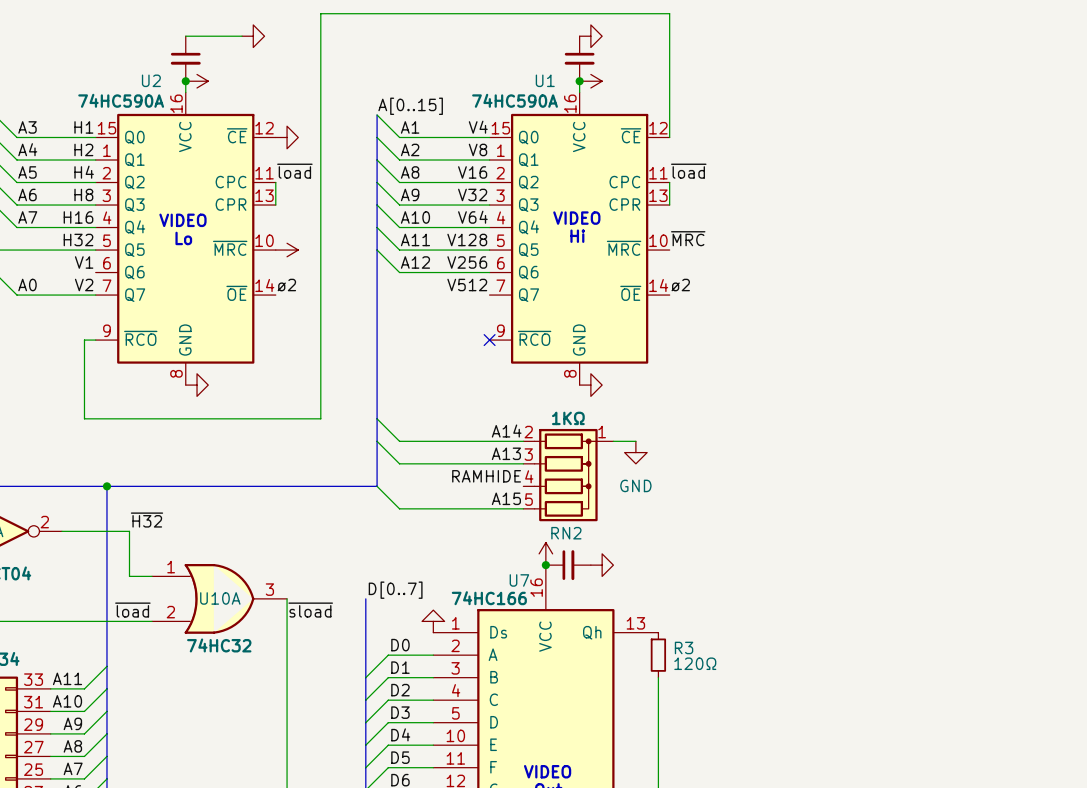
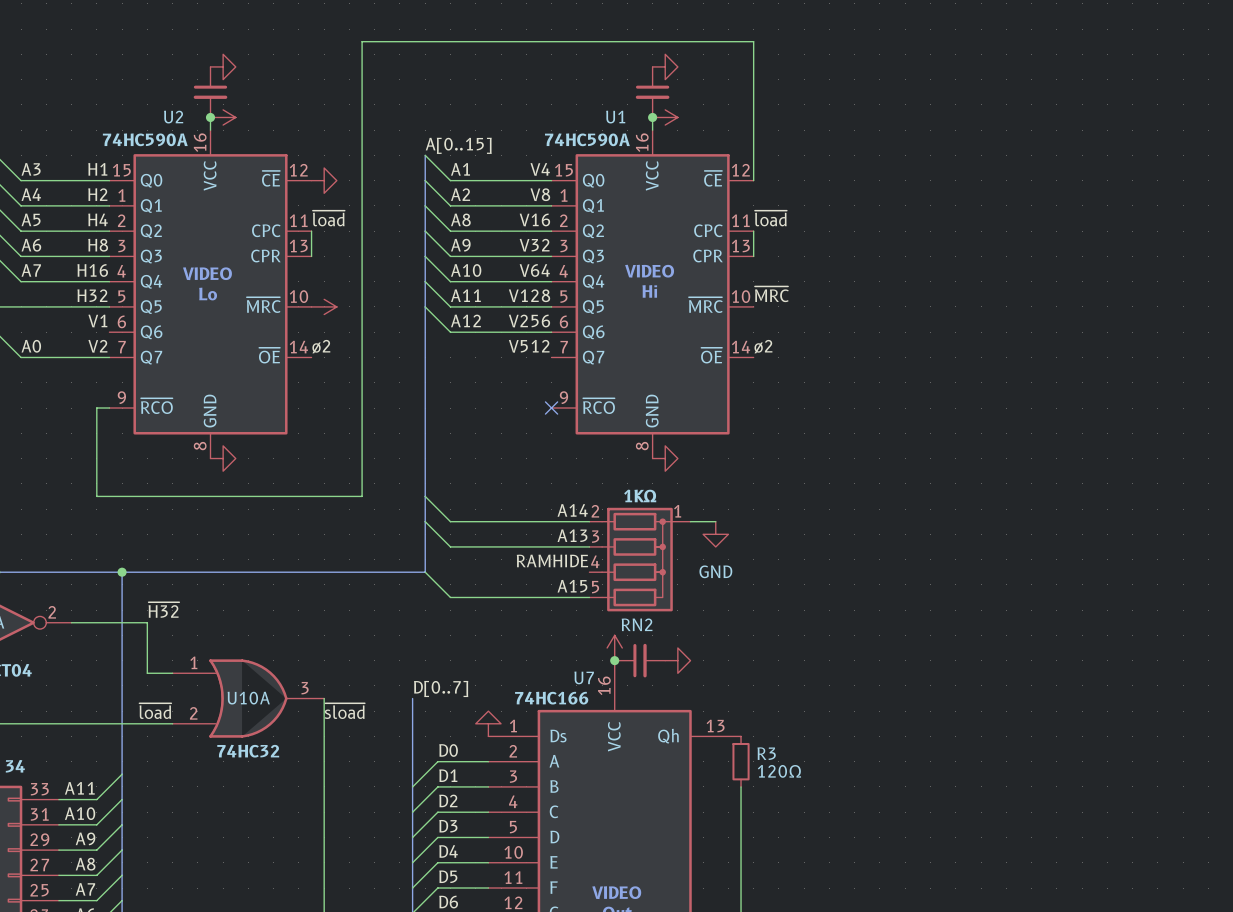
wire: (185, 36) (242, 36) -> none
power symbol position: (253, 36) -> (223, 66)

